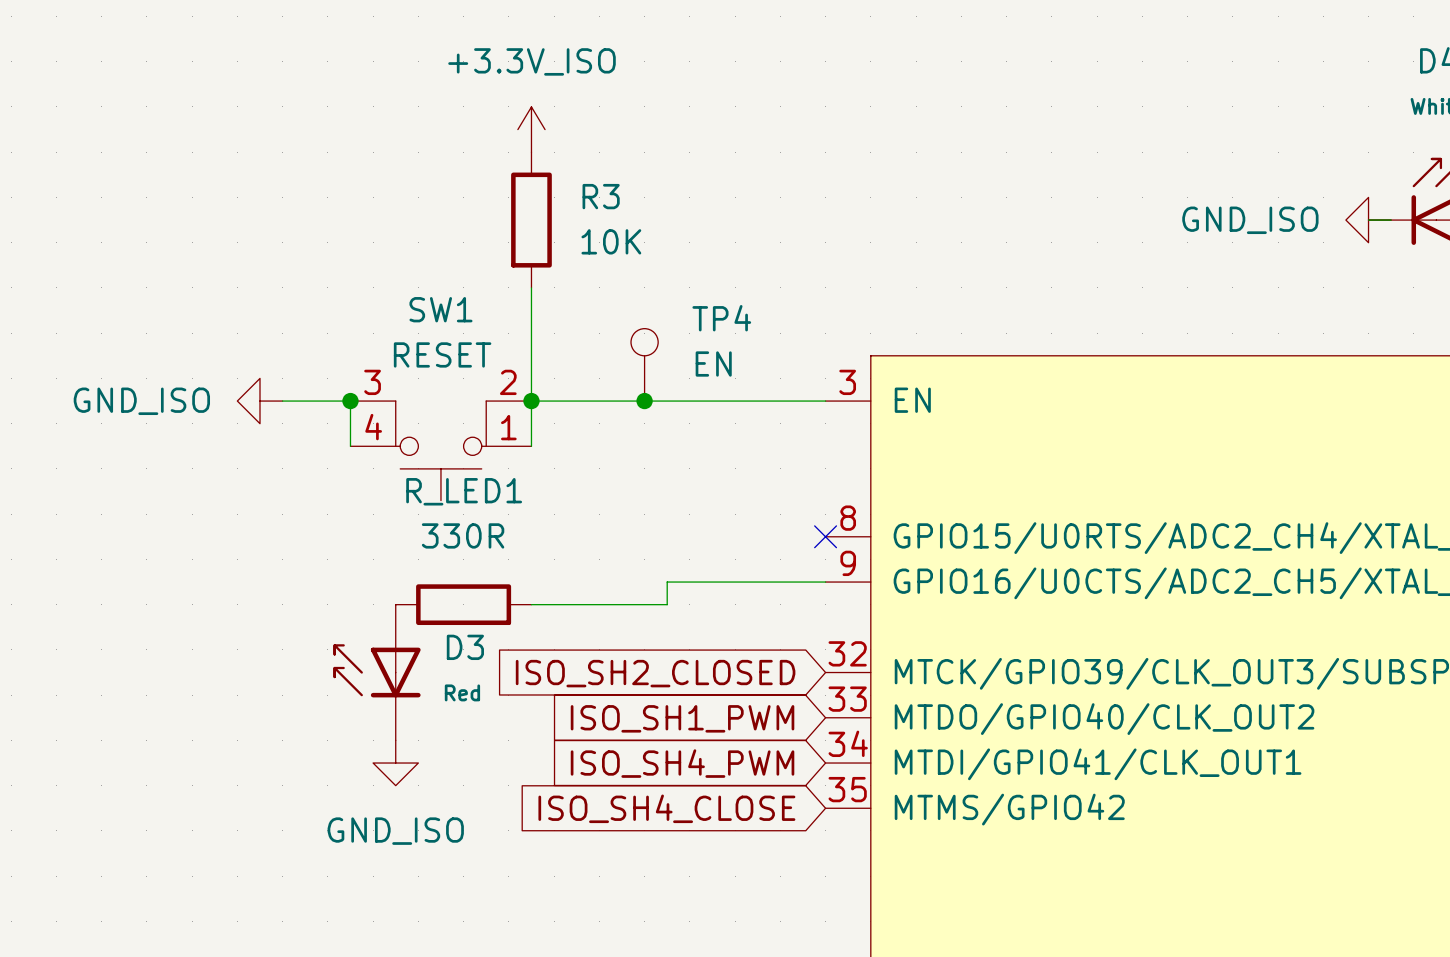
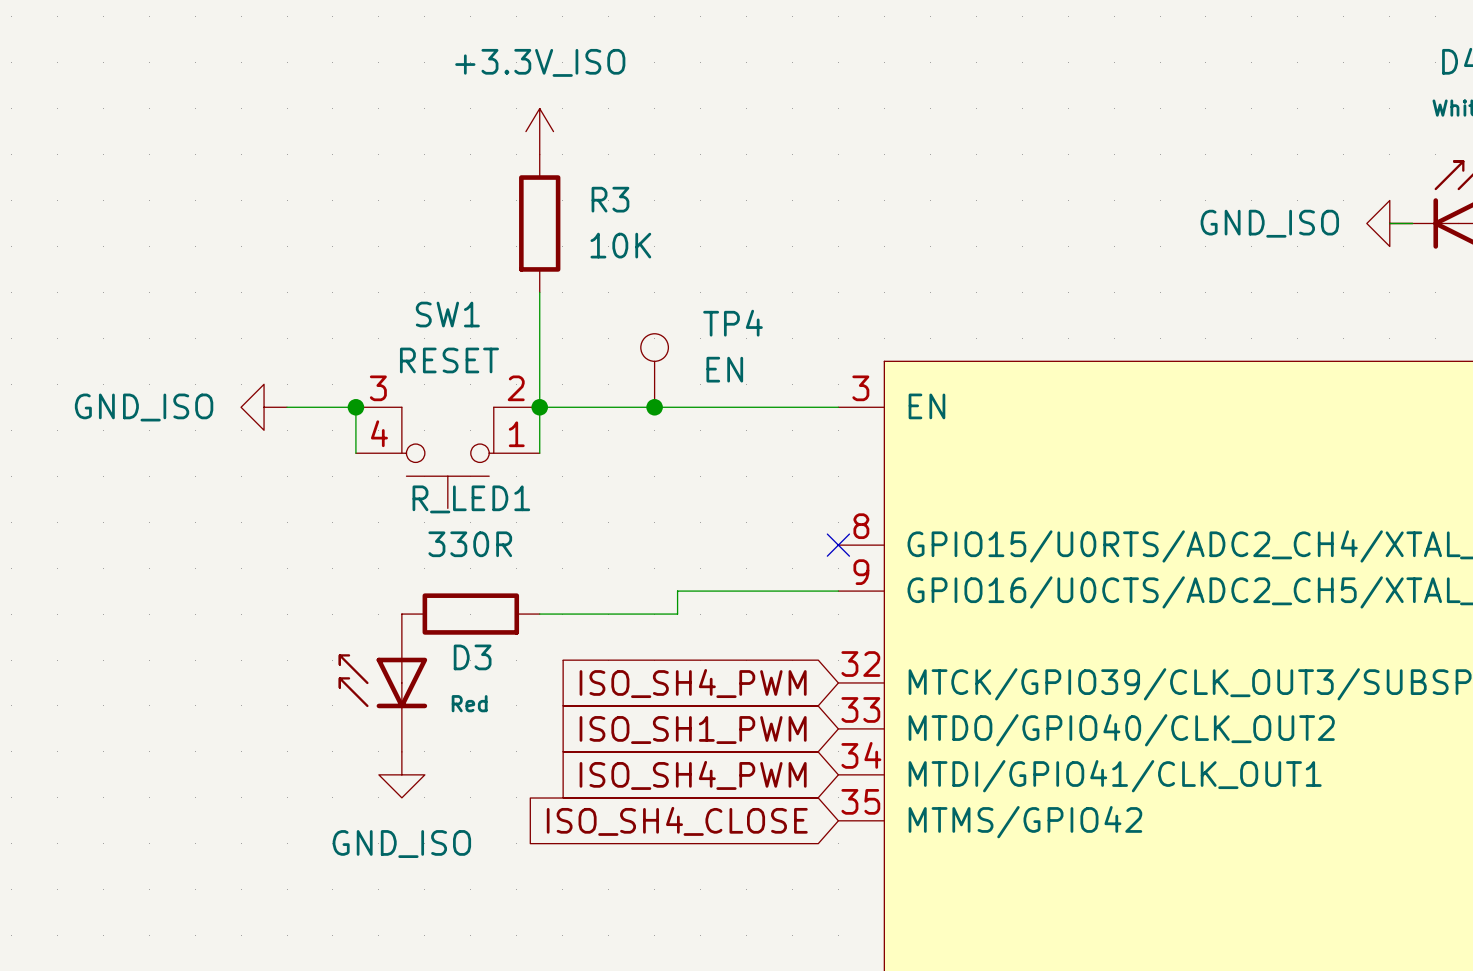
global label: ISO_SH2_CLOSED (655, 673) -> ISO_SH4_PWM (693, 683)

